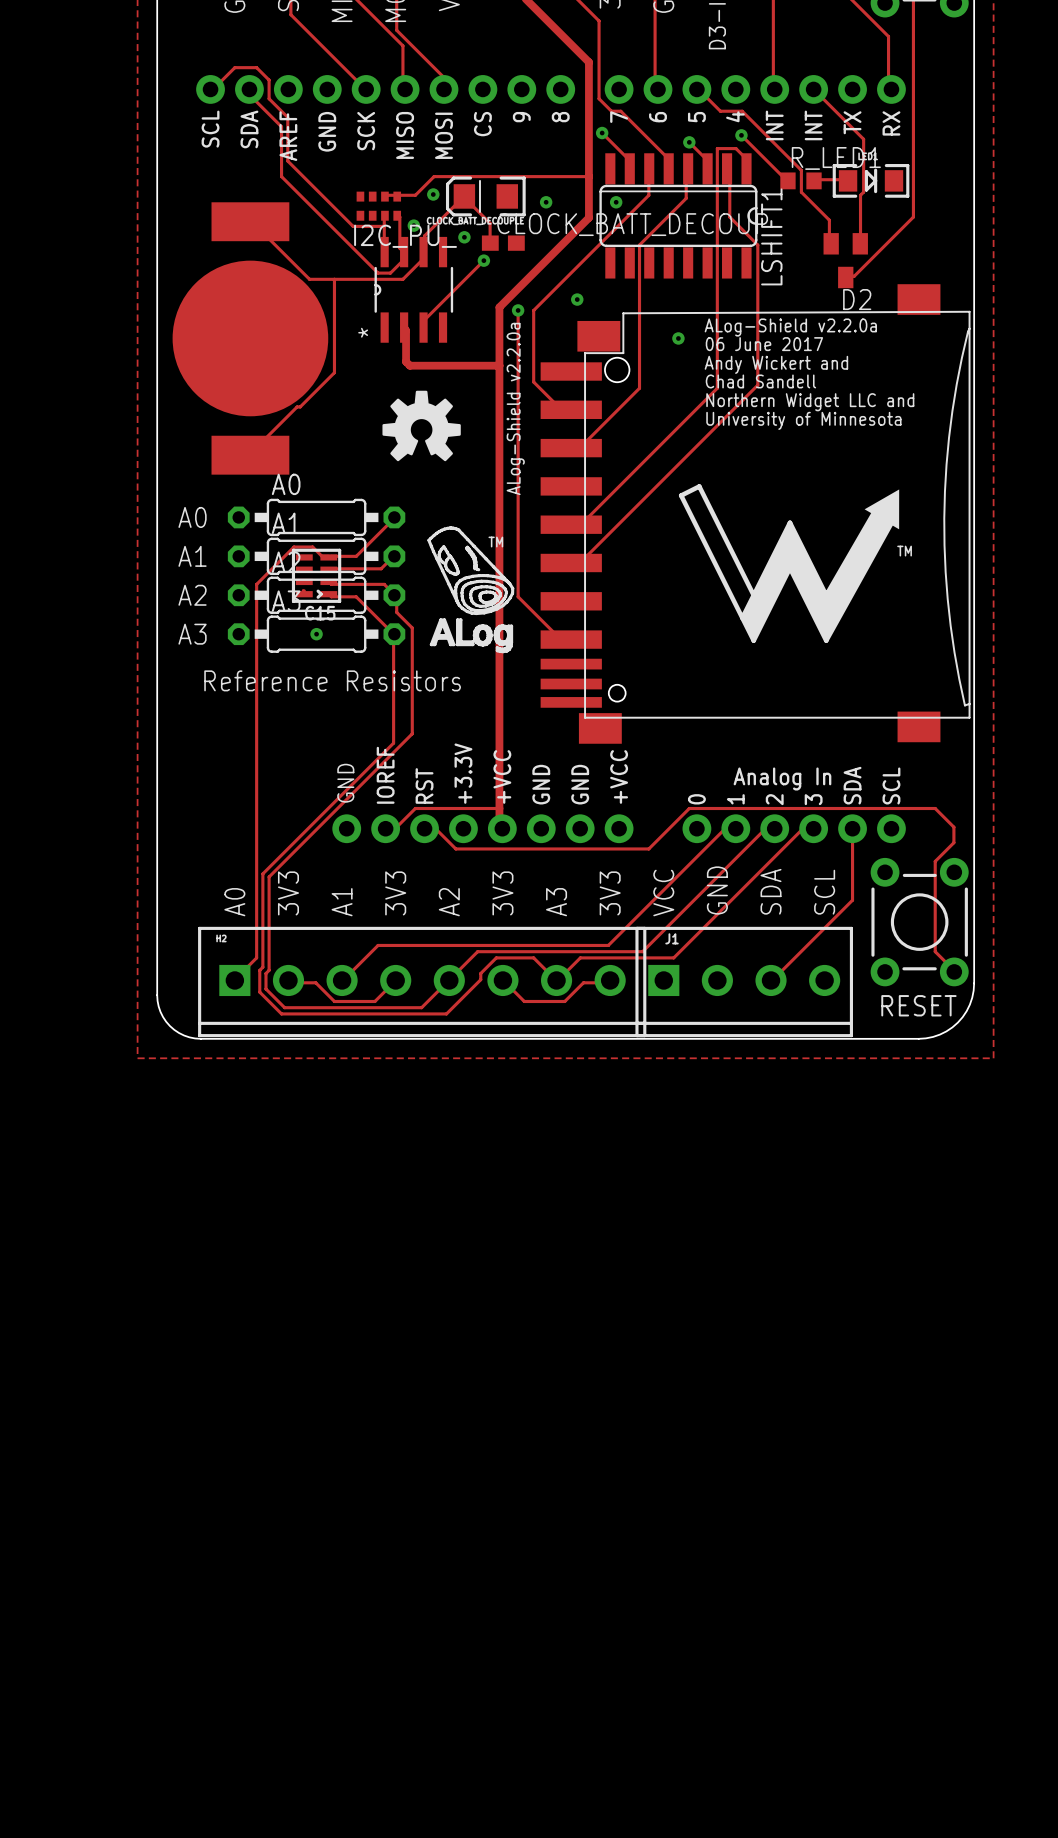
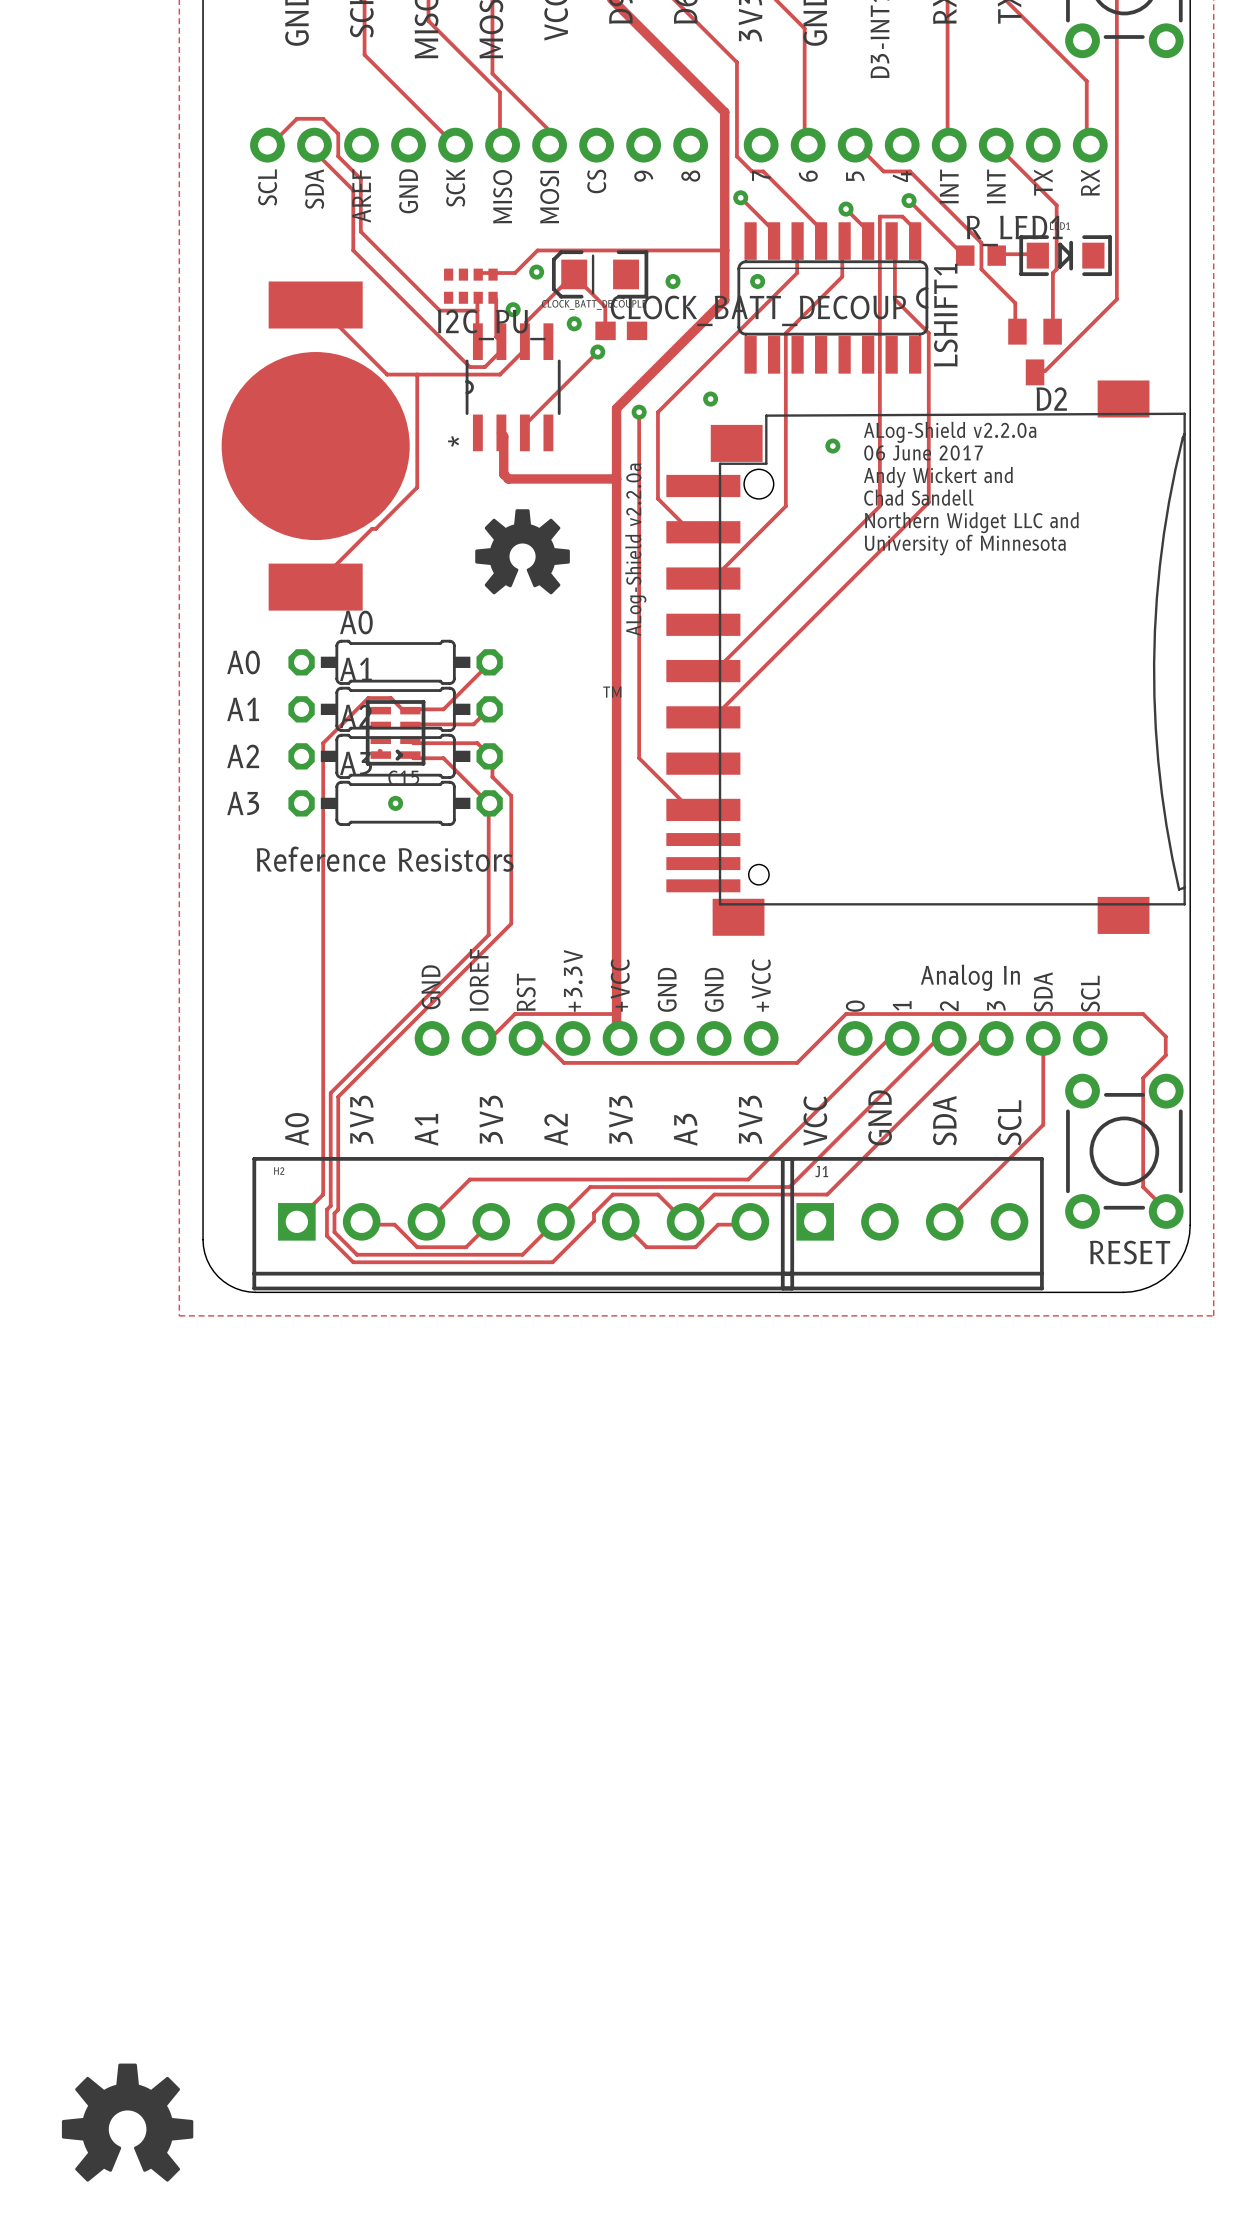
drawing: [678, 484, 900, 643] -> none
drawing: [427, 526, 515, 654] -> none
text: TM (904, 551) -> none
drawing: none -> [61, 2063, 194, 2182]

